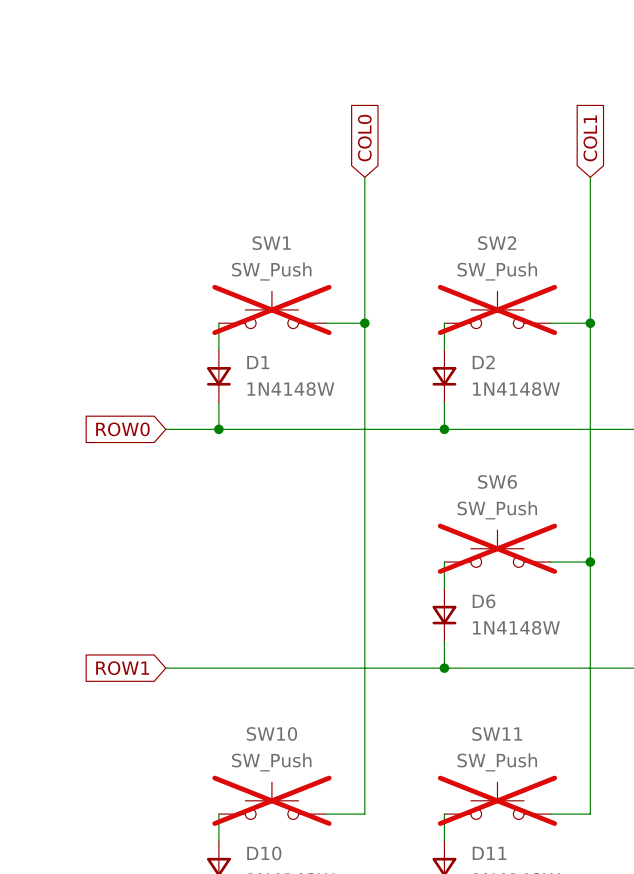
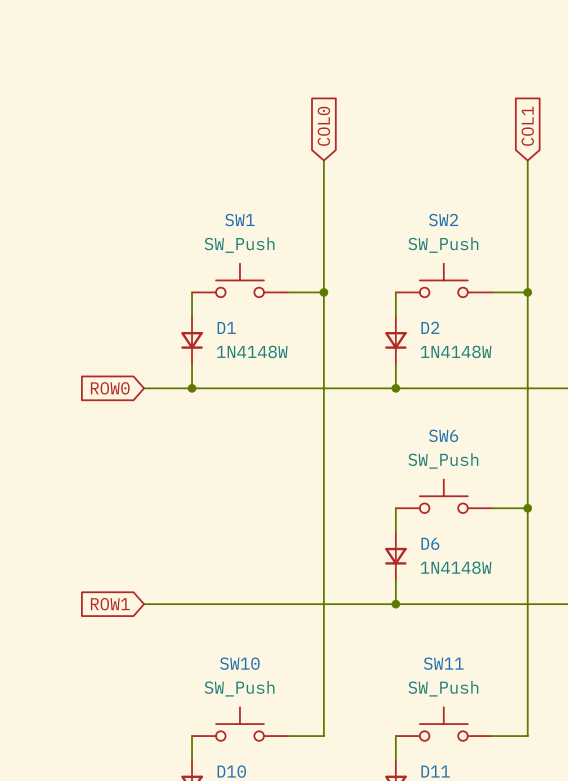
SW1 do-not-place cross: (271, 309) -> none
SW2 do-not-place cross: (497, 309) -> none
SW6 do-not-place cross: (497, 548) -> none
SW10 do-not-place cross: (271, 800) -> none
SW11 do-not-place cross: (497, 800) -> none

